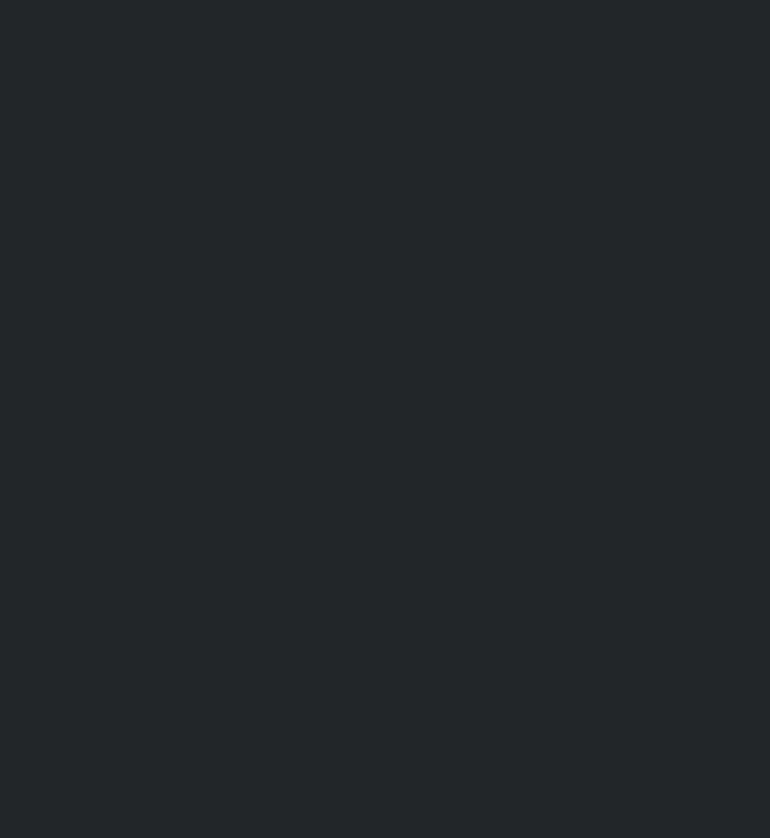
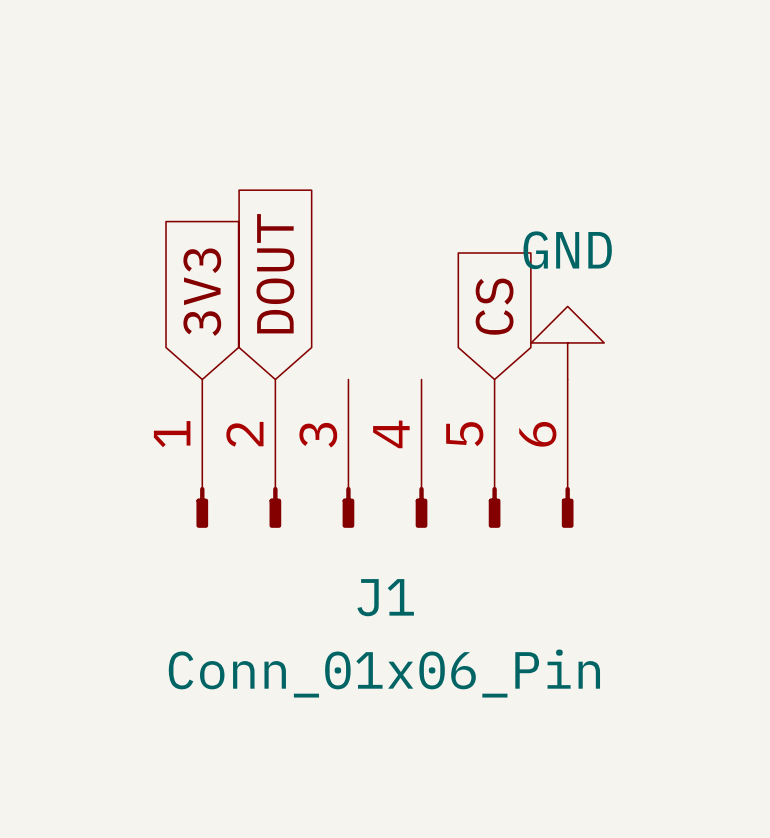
global label: none -> DOUT (275, 273)
global label: none -> 3V3 (202, 292)
global label: none -> CS (494, 306)
power symbol: none -> GND (567, 342)
J1: none -> Conn_01x06_Pin (384, 453)

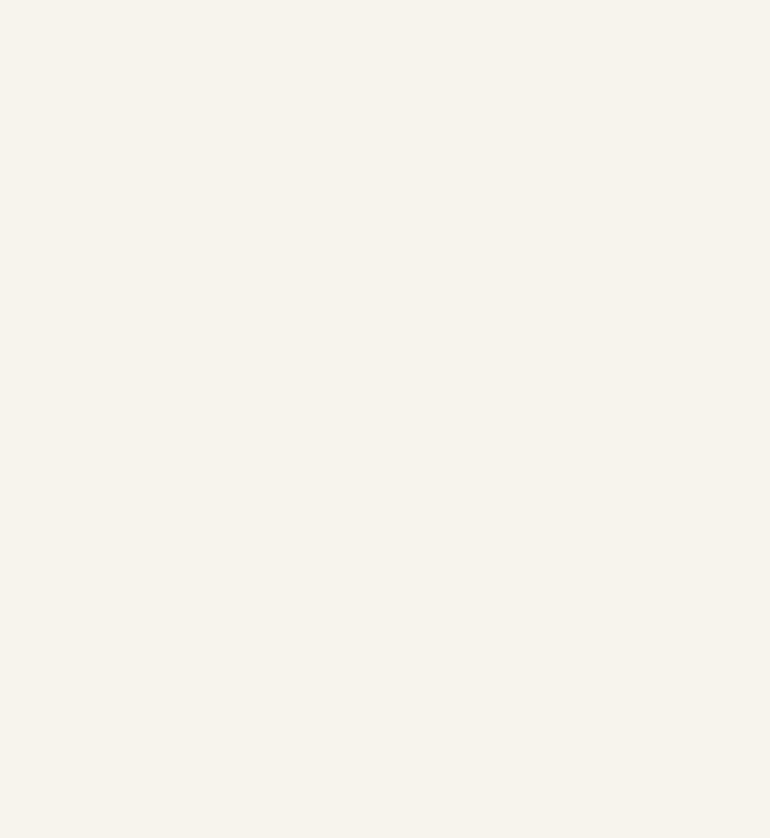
global label: DOUT (275, 273) -> none
global label: 3V3 (202, 292) -> none
global label: CS (494, 306) -> none
power symbol: GND (567, 342) -> none
J1: Conn_01x06_Pin (384, 453) -> none

